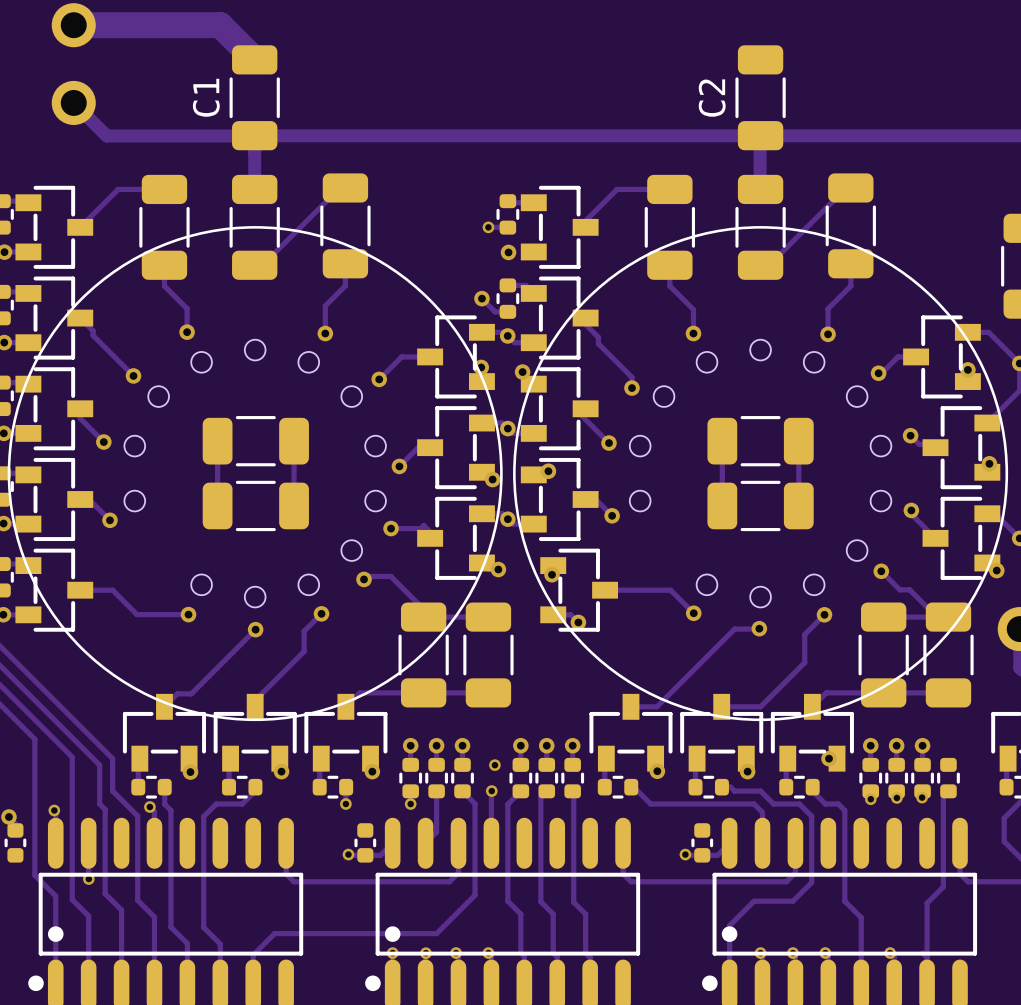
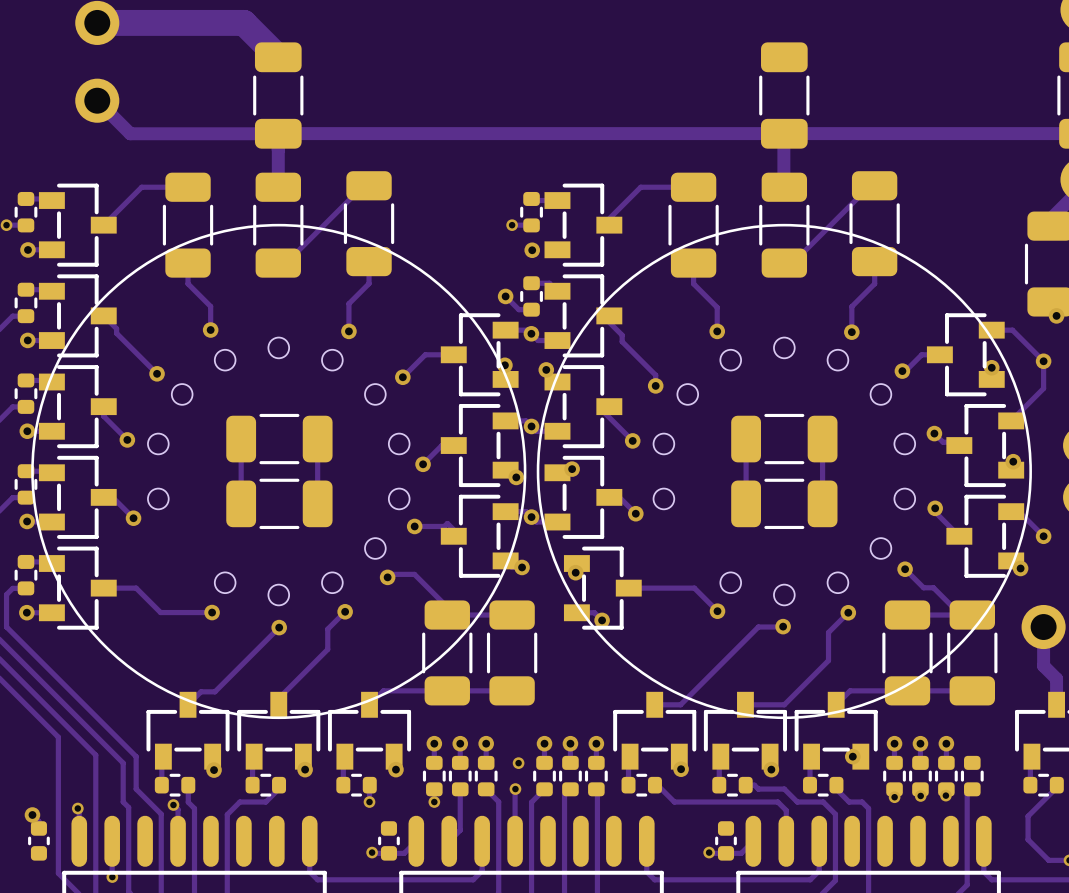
C1: (254, 97) -> none
part: none -> (278, 95)
C2: (760, 97) -> none
part: none -> (784, 95)

